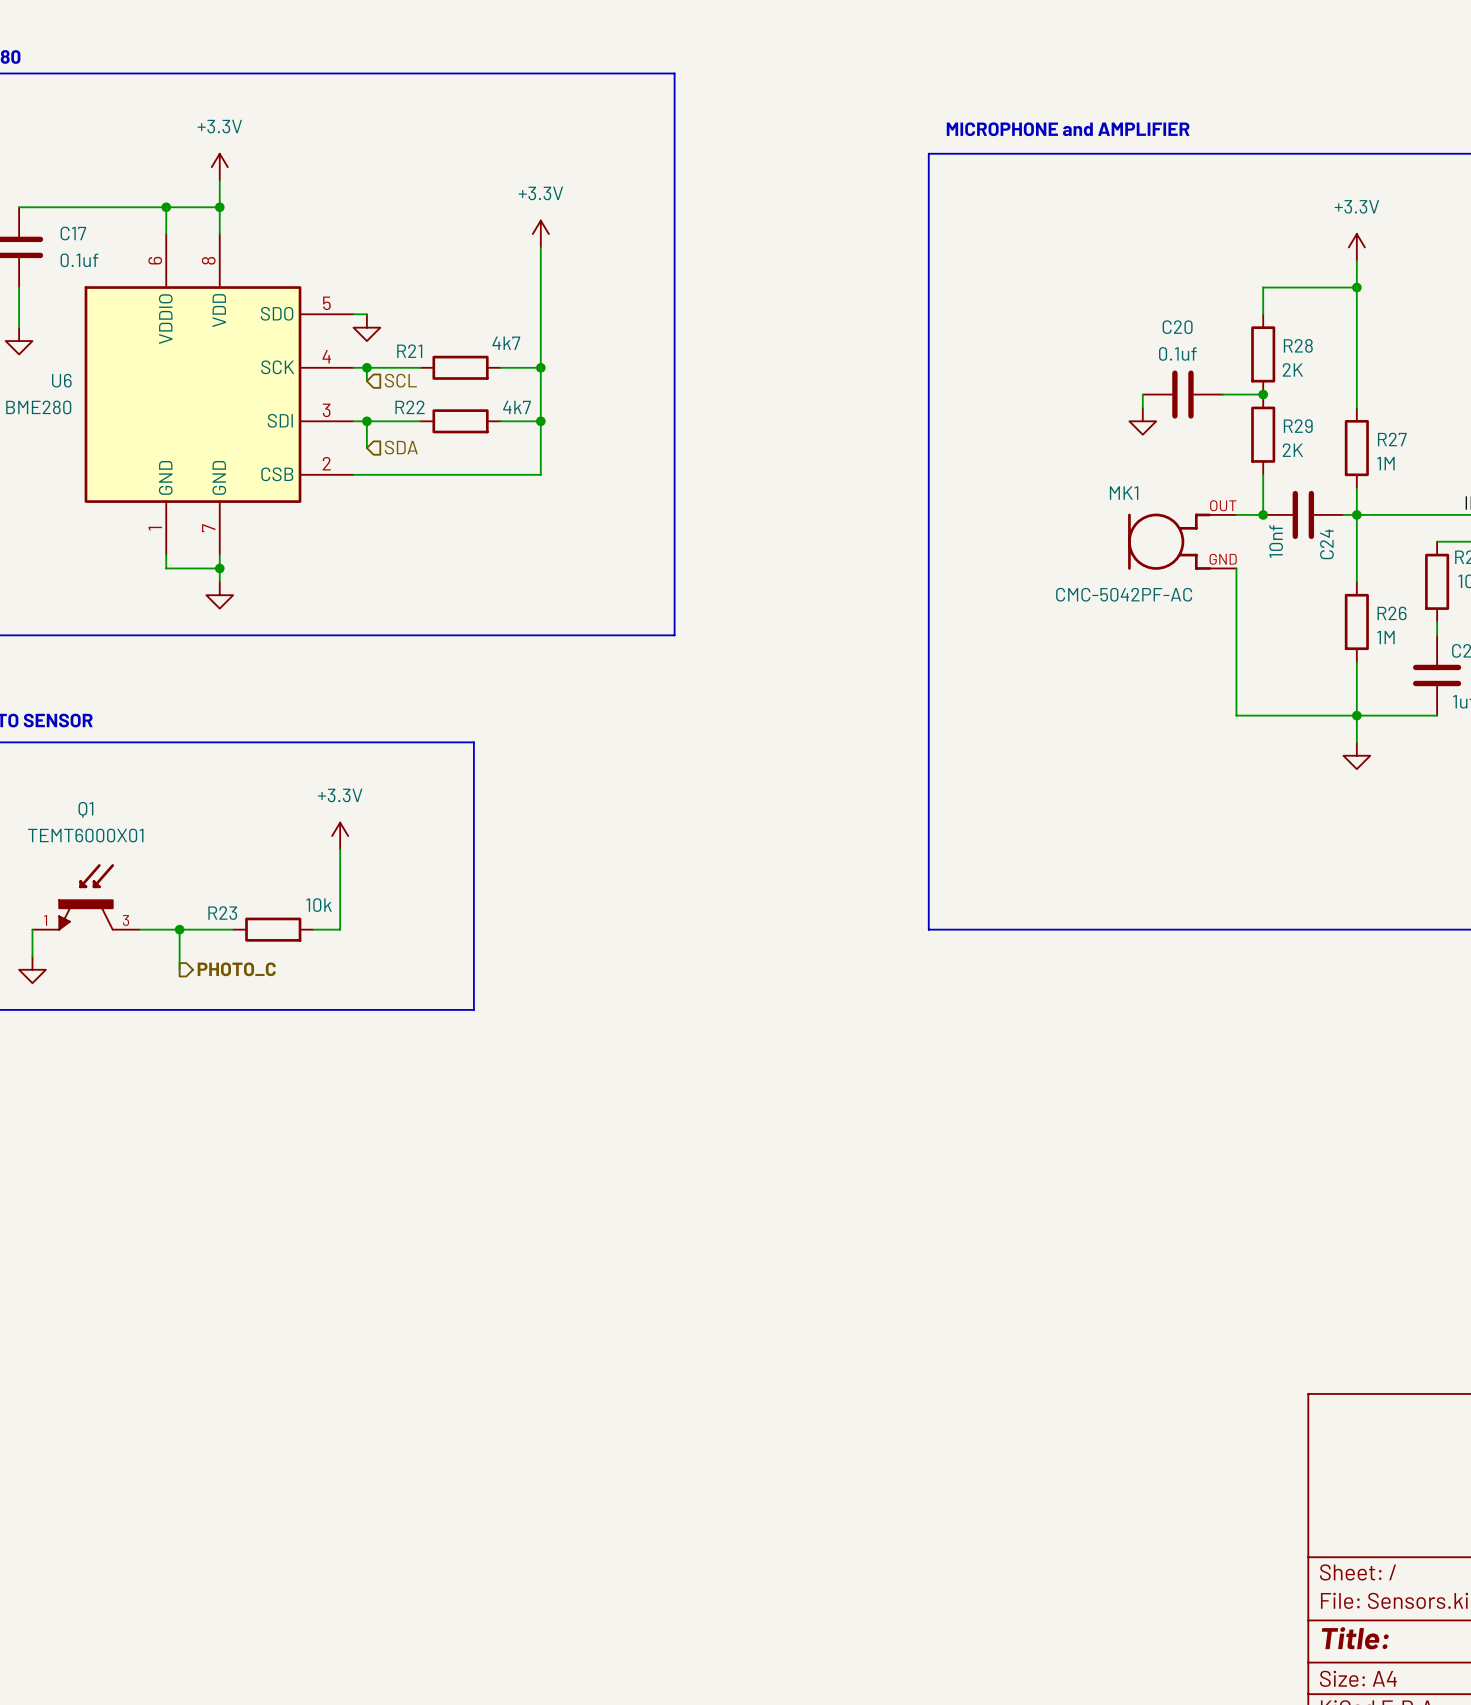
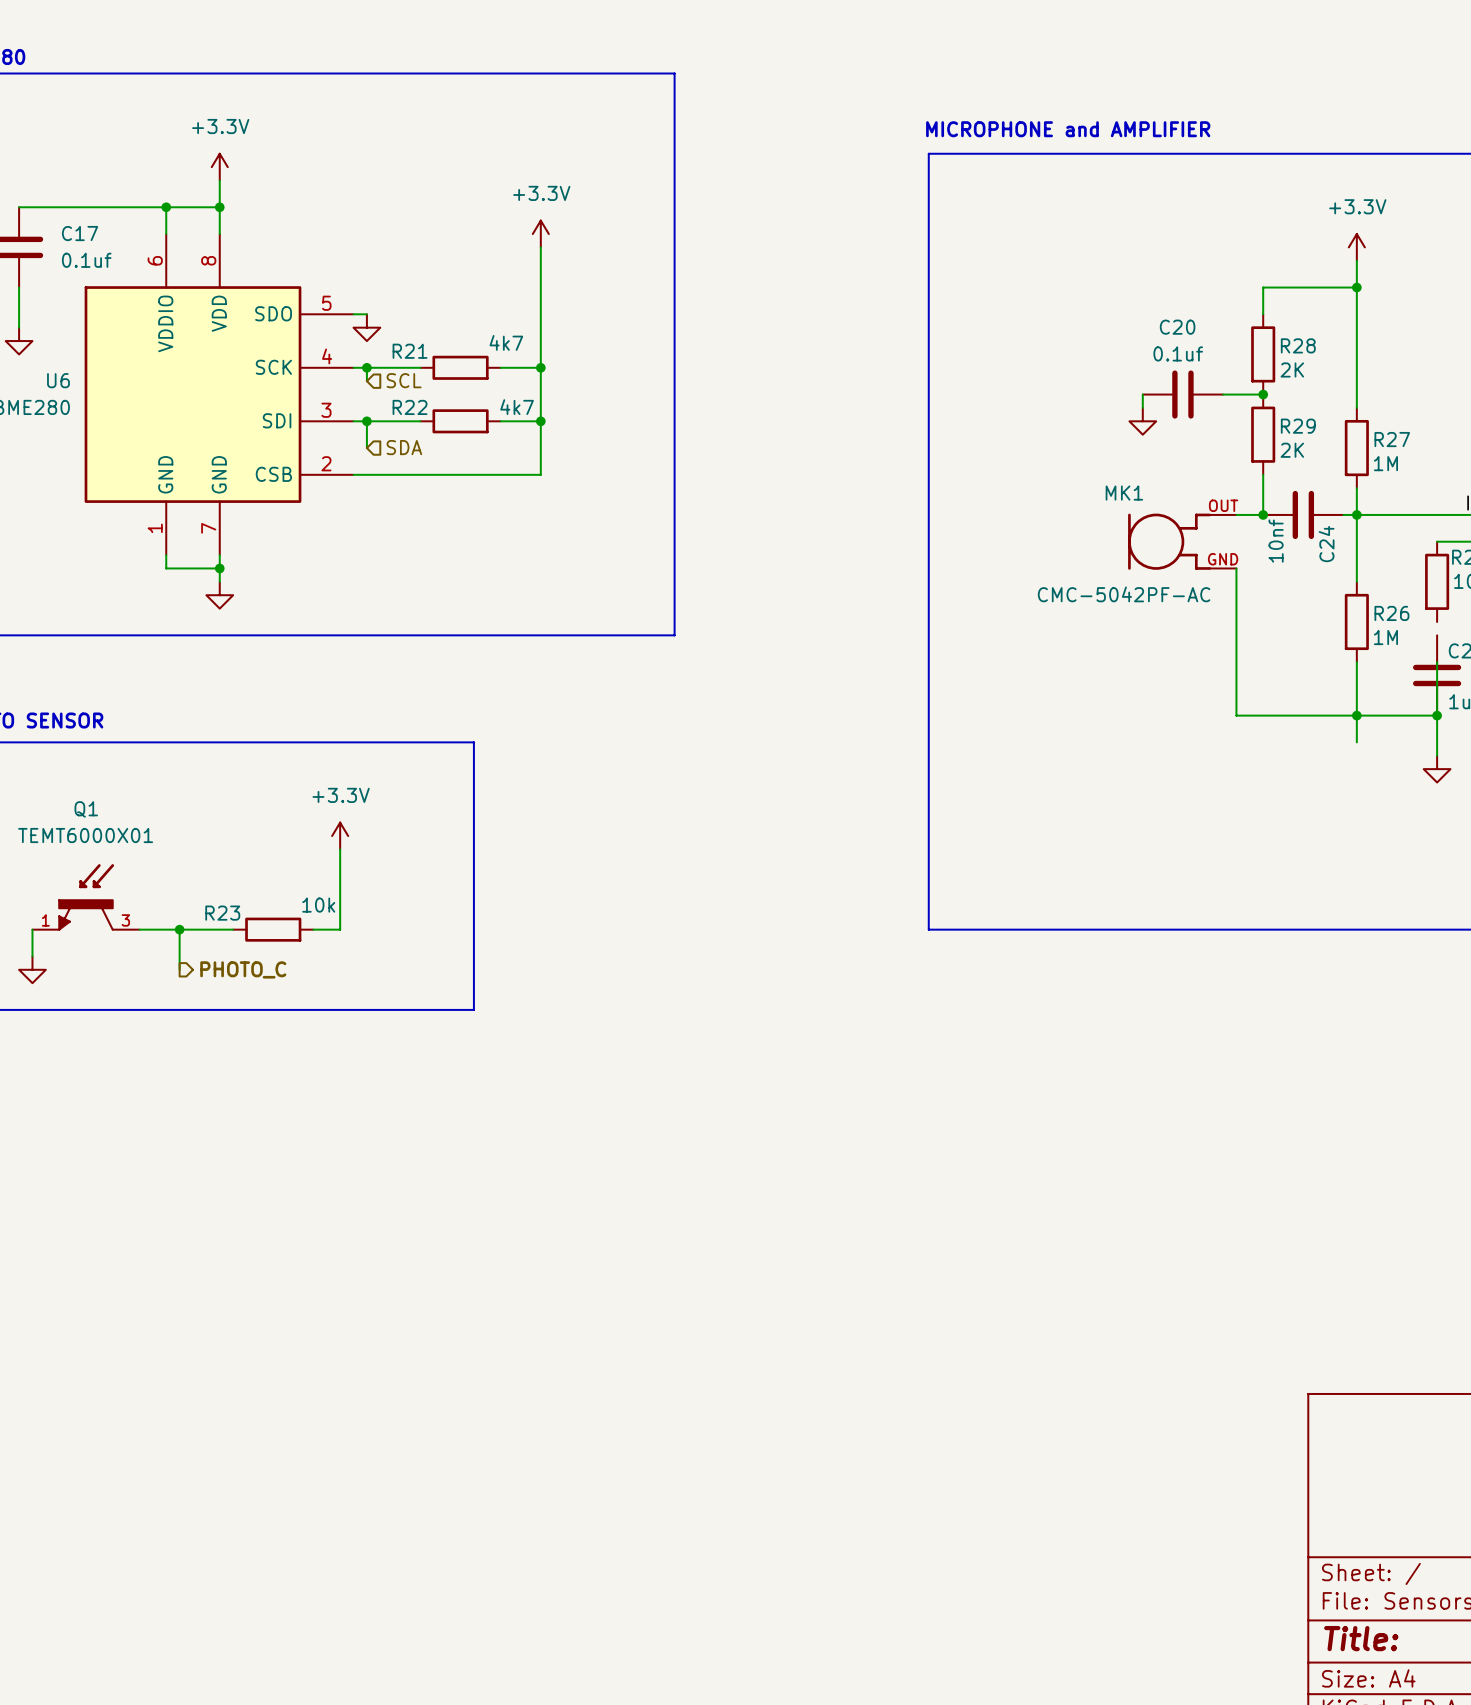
wire: (1437, 621) (1437, 635) -> none
wire: none -> (1437, 662) (1437, 755)
junction: none -> (1437, 715)
power symbol position: (1356, 755) -> (1437, 769)

